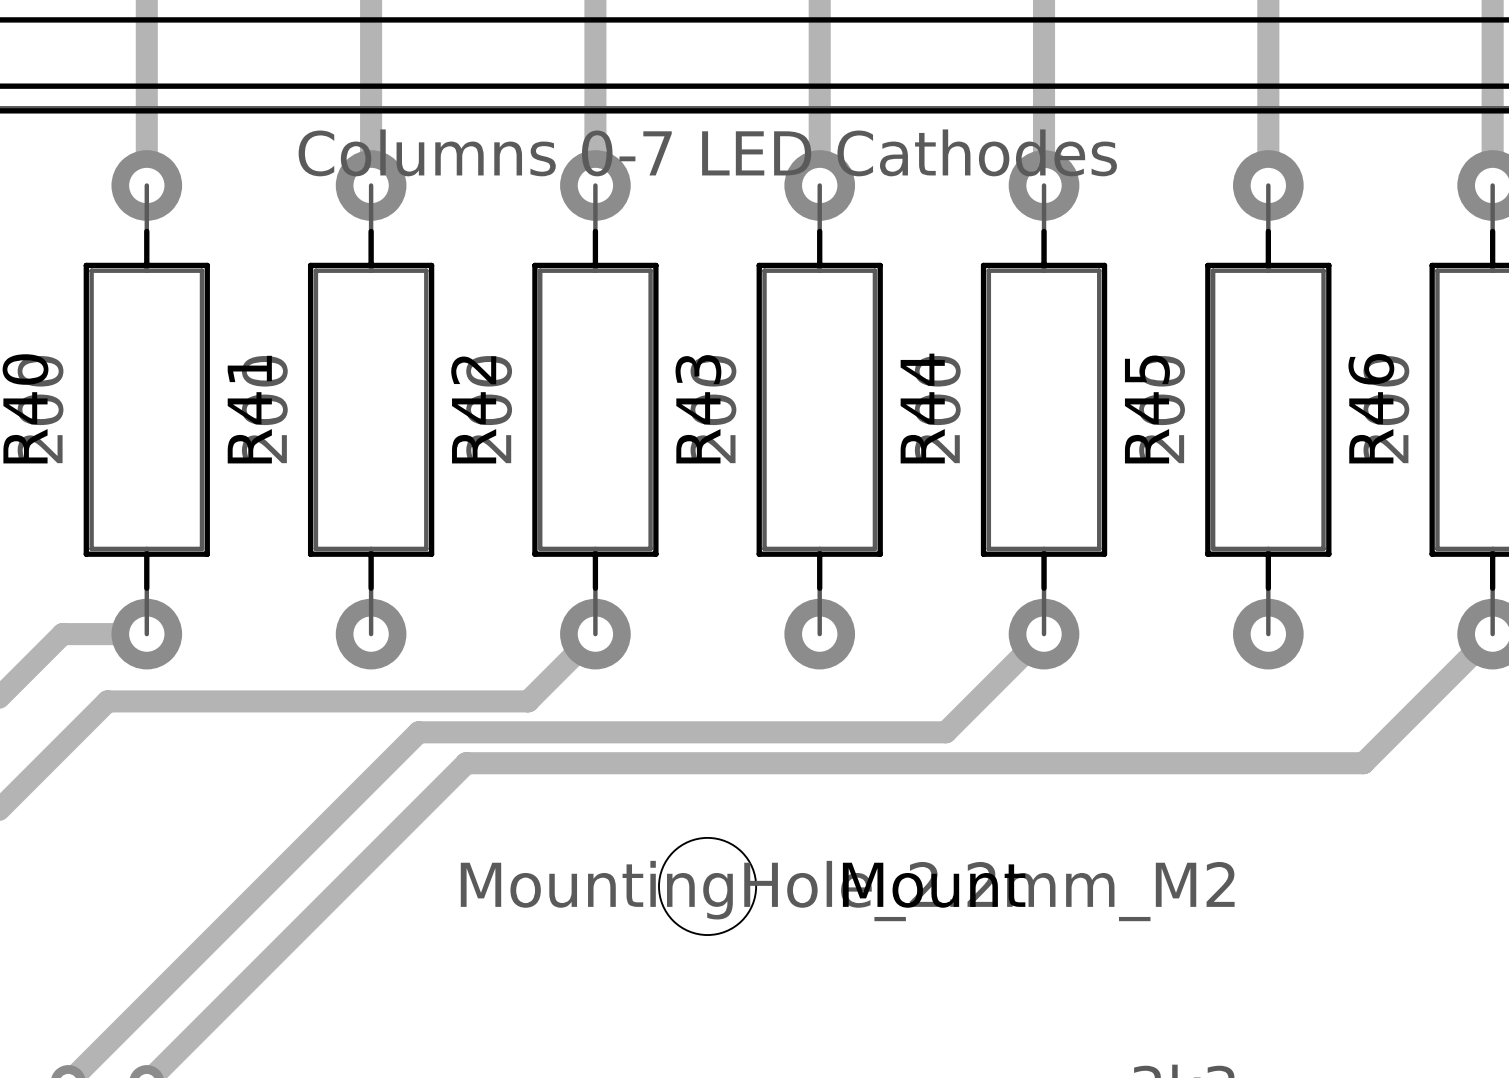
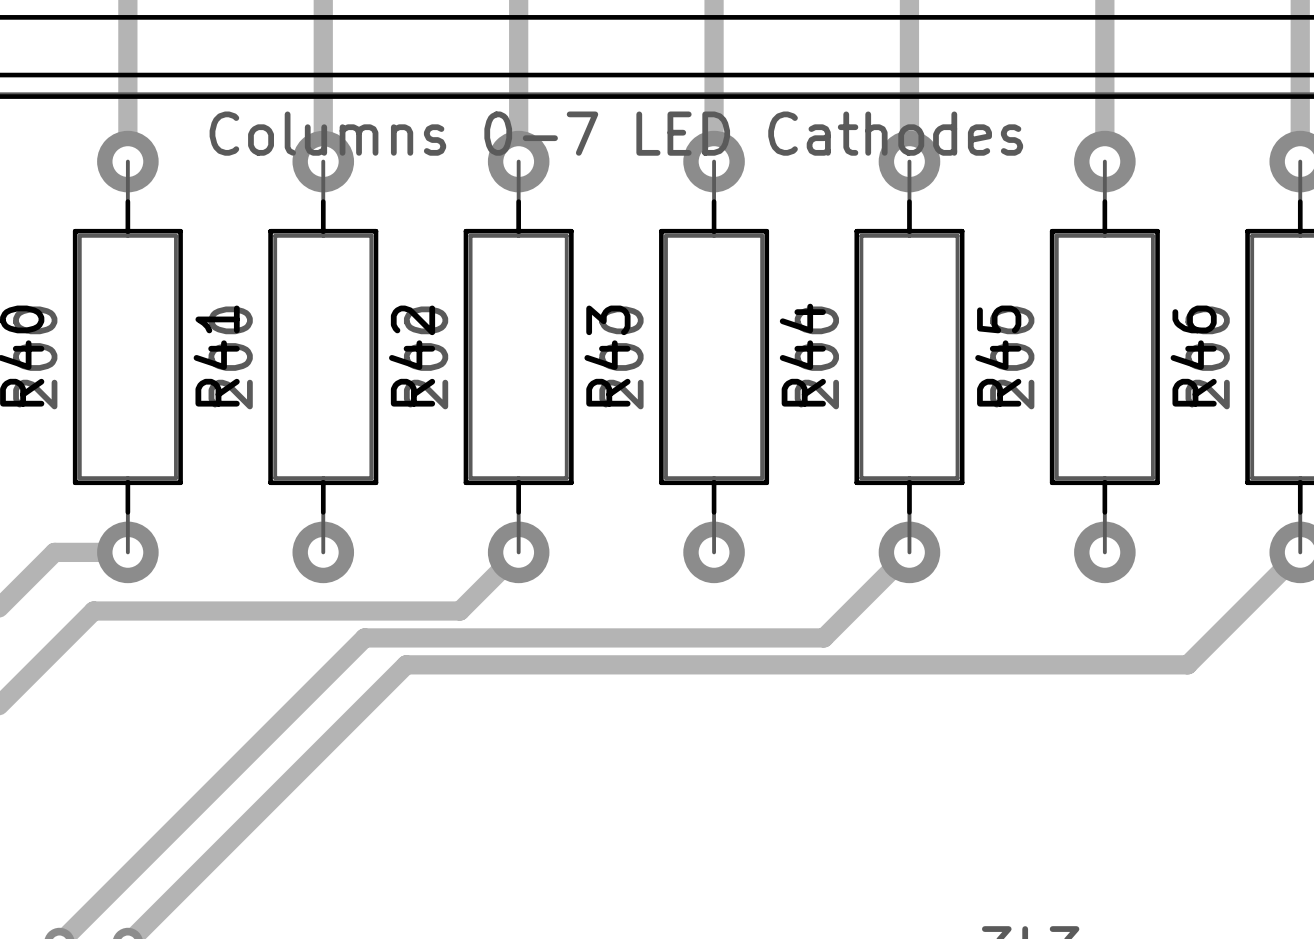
Mount: MountingHole_2.2mm_M2 (707, 886) -> none

